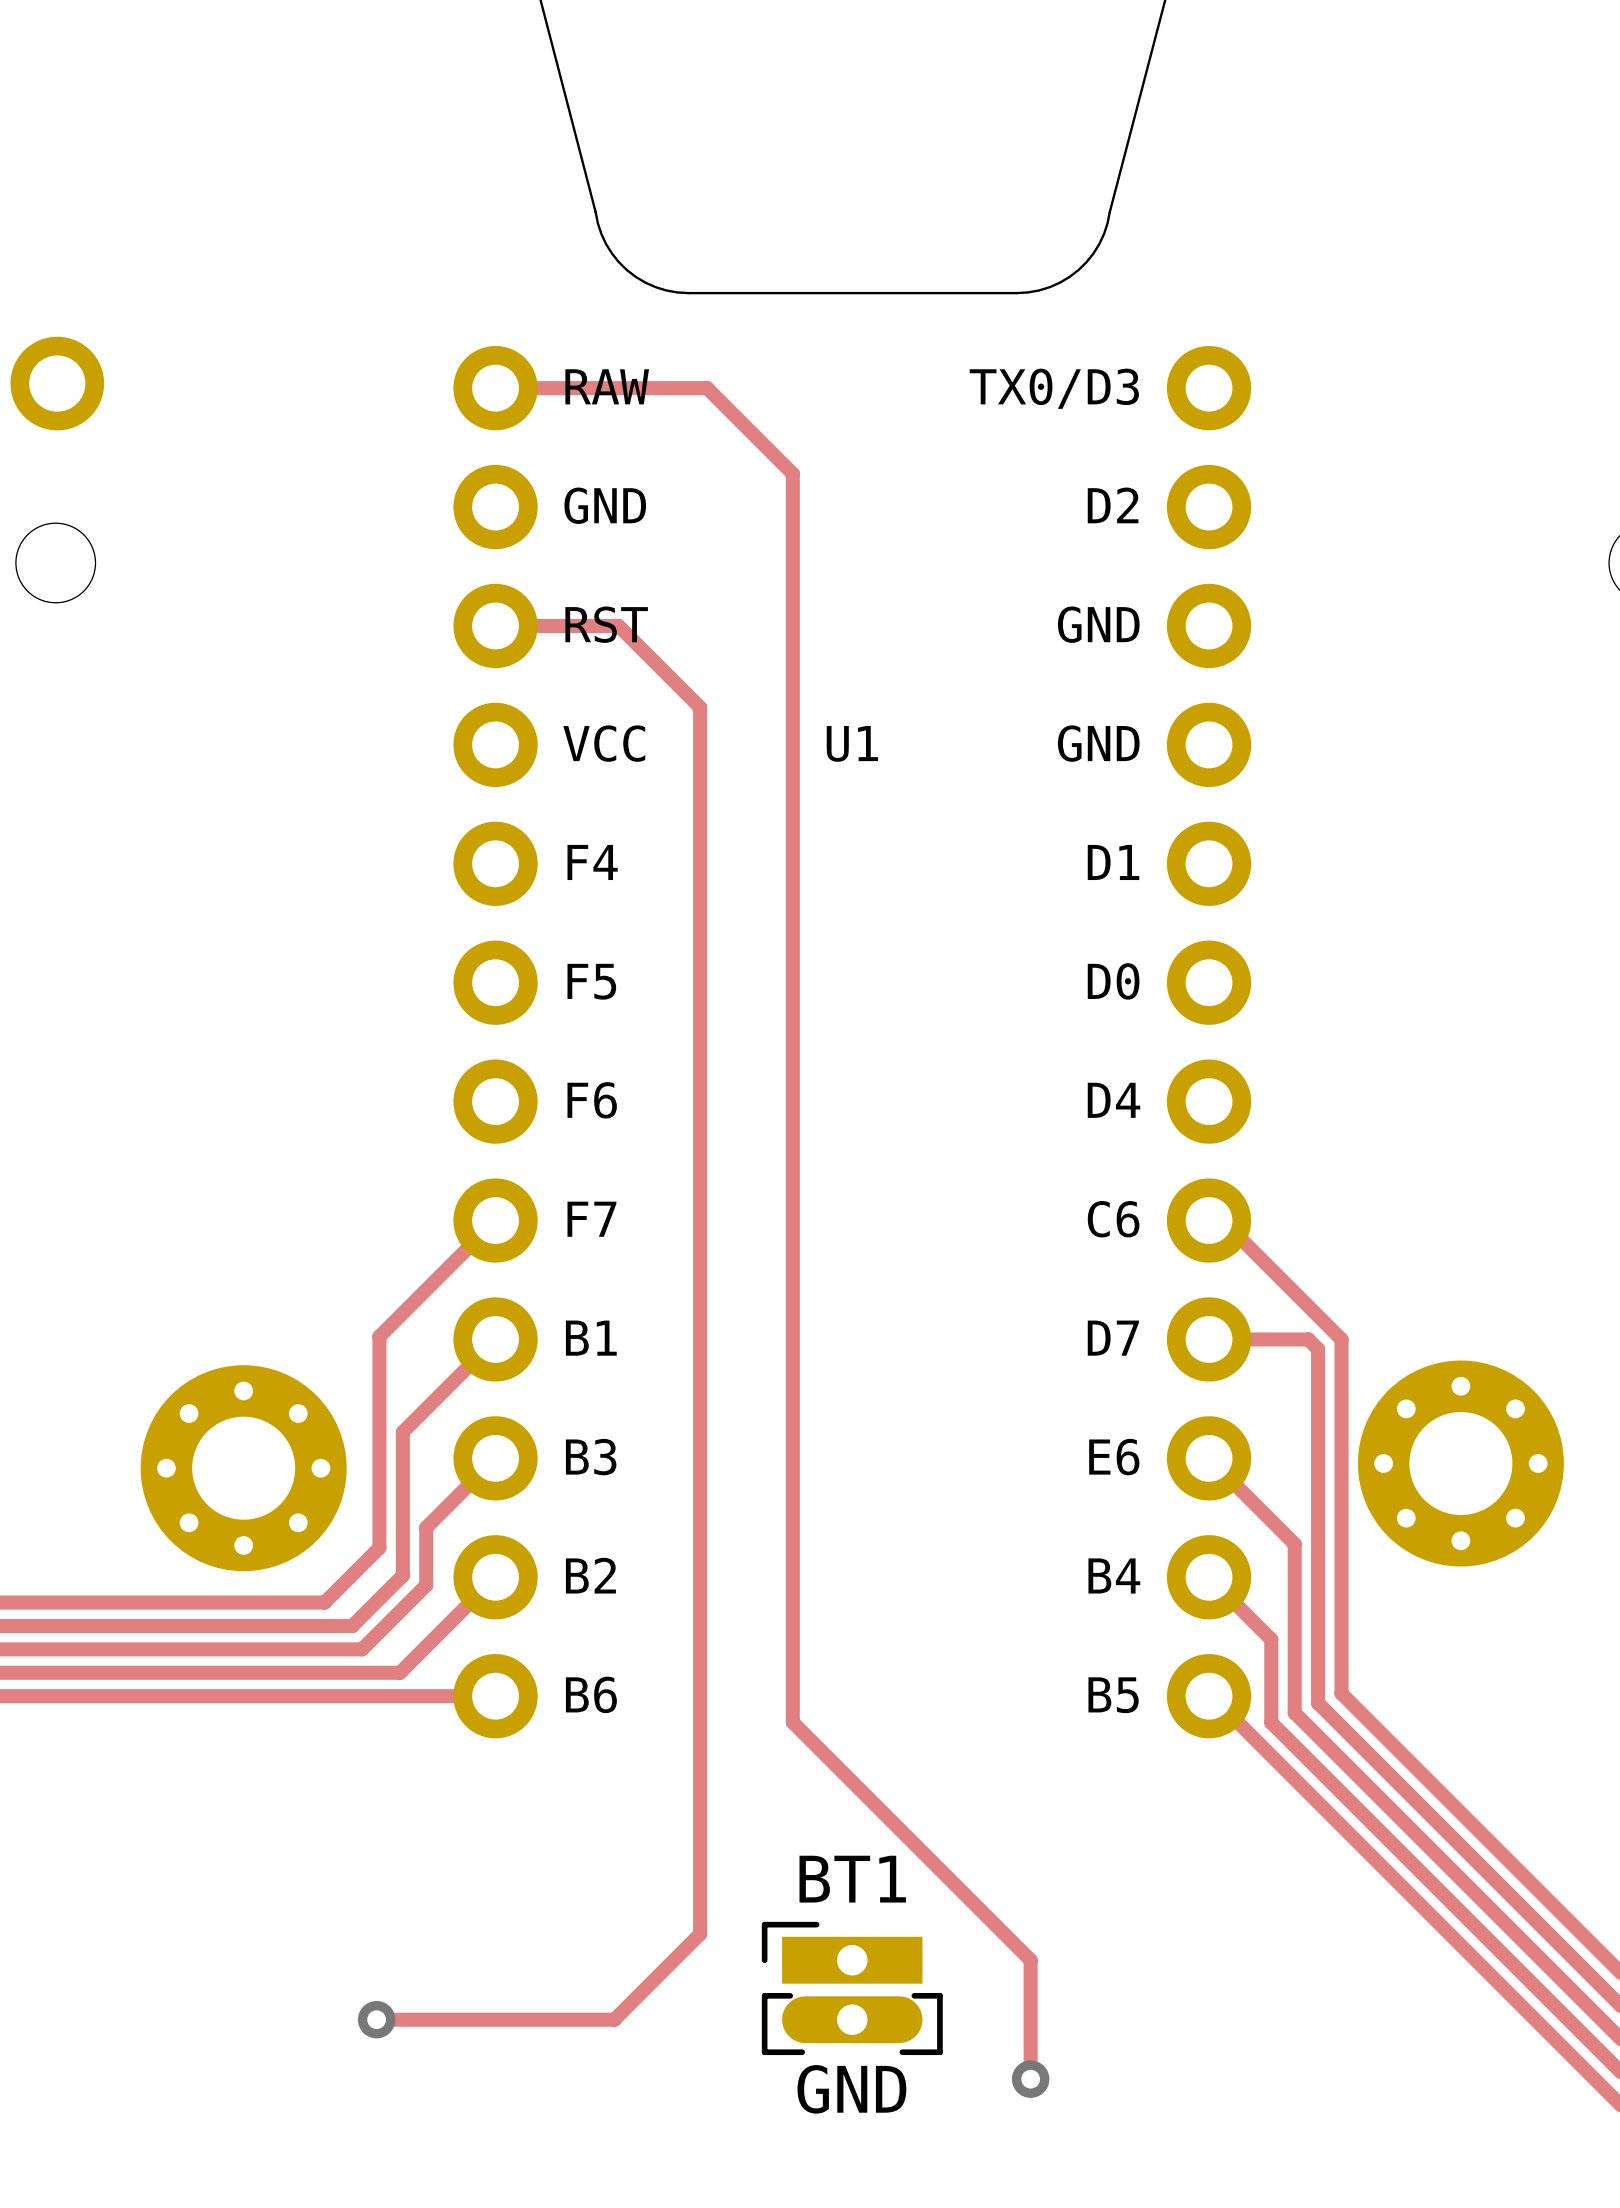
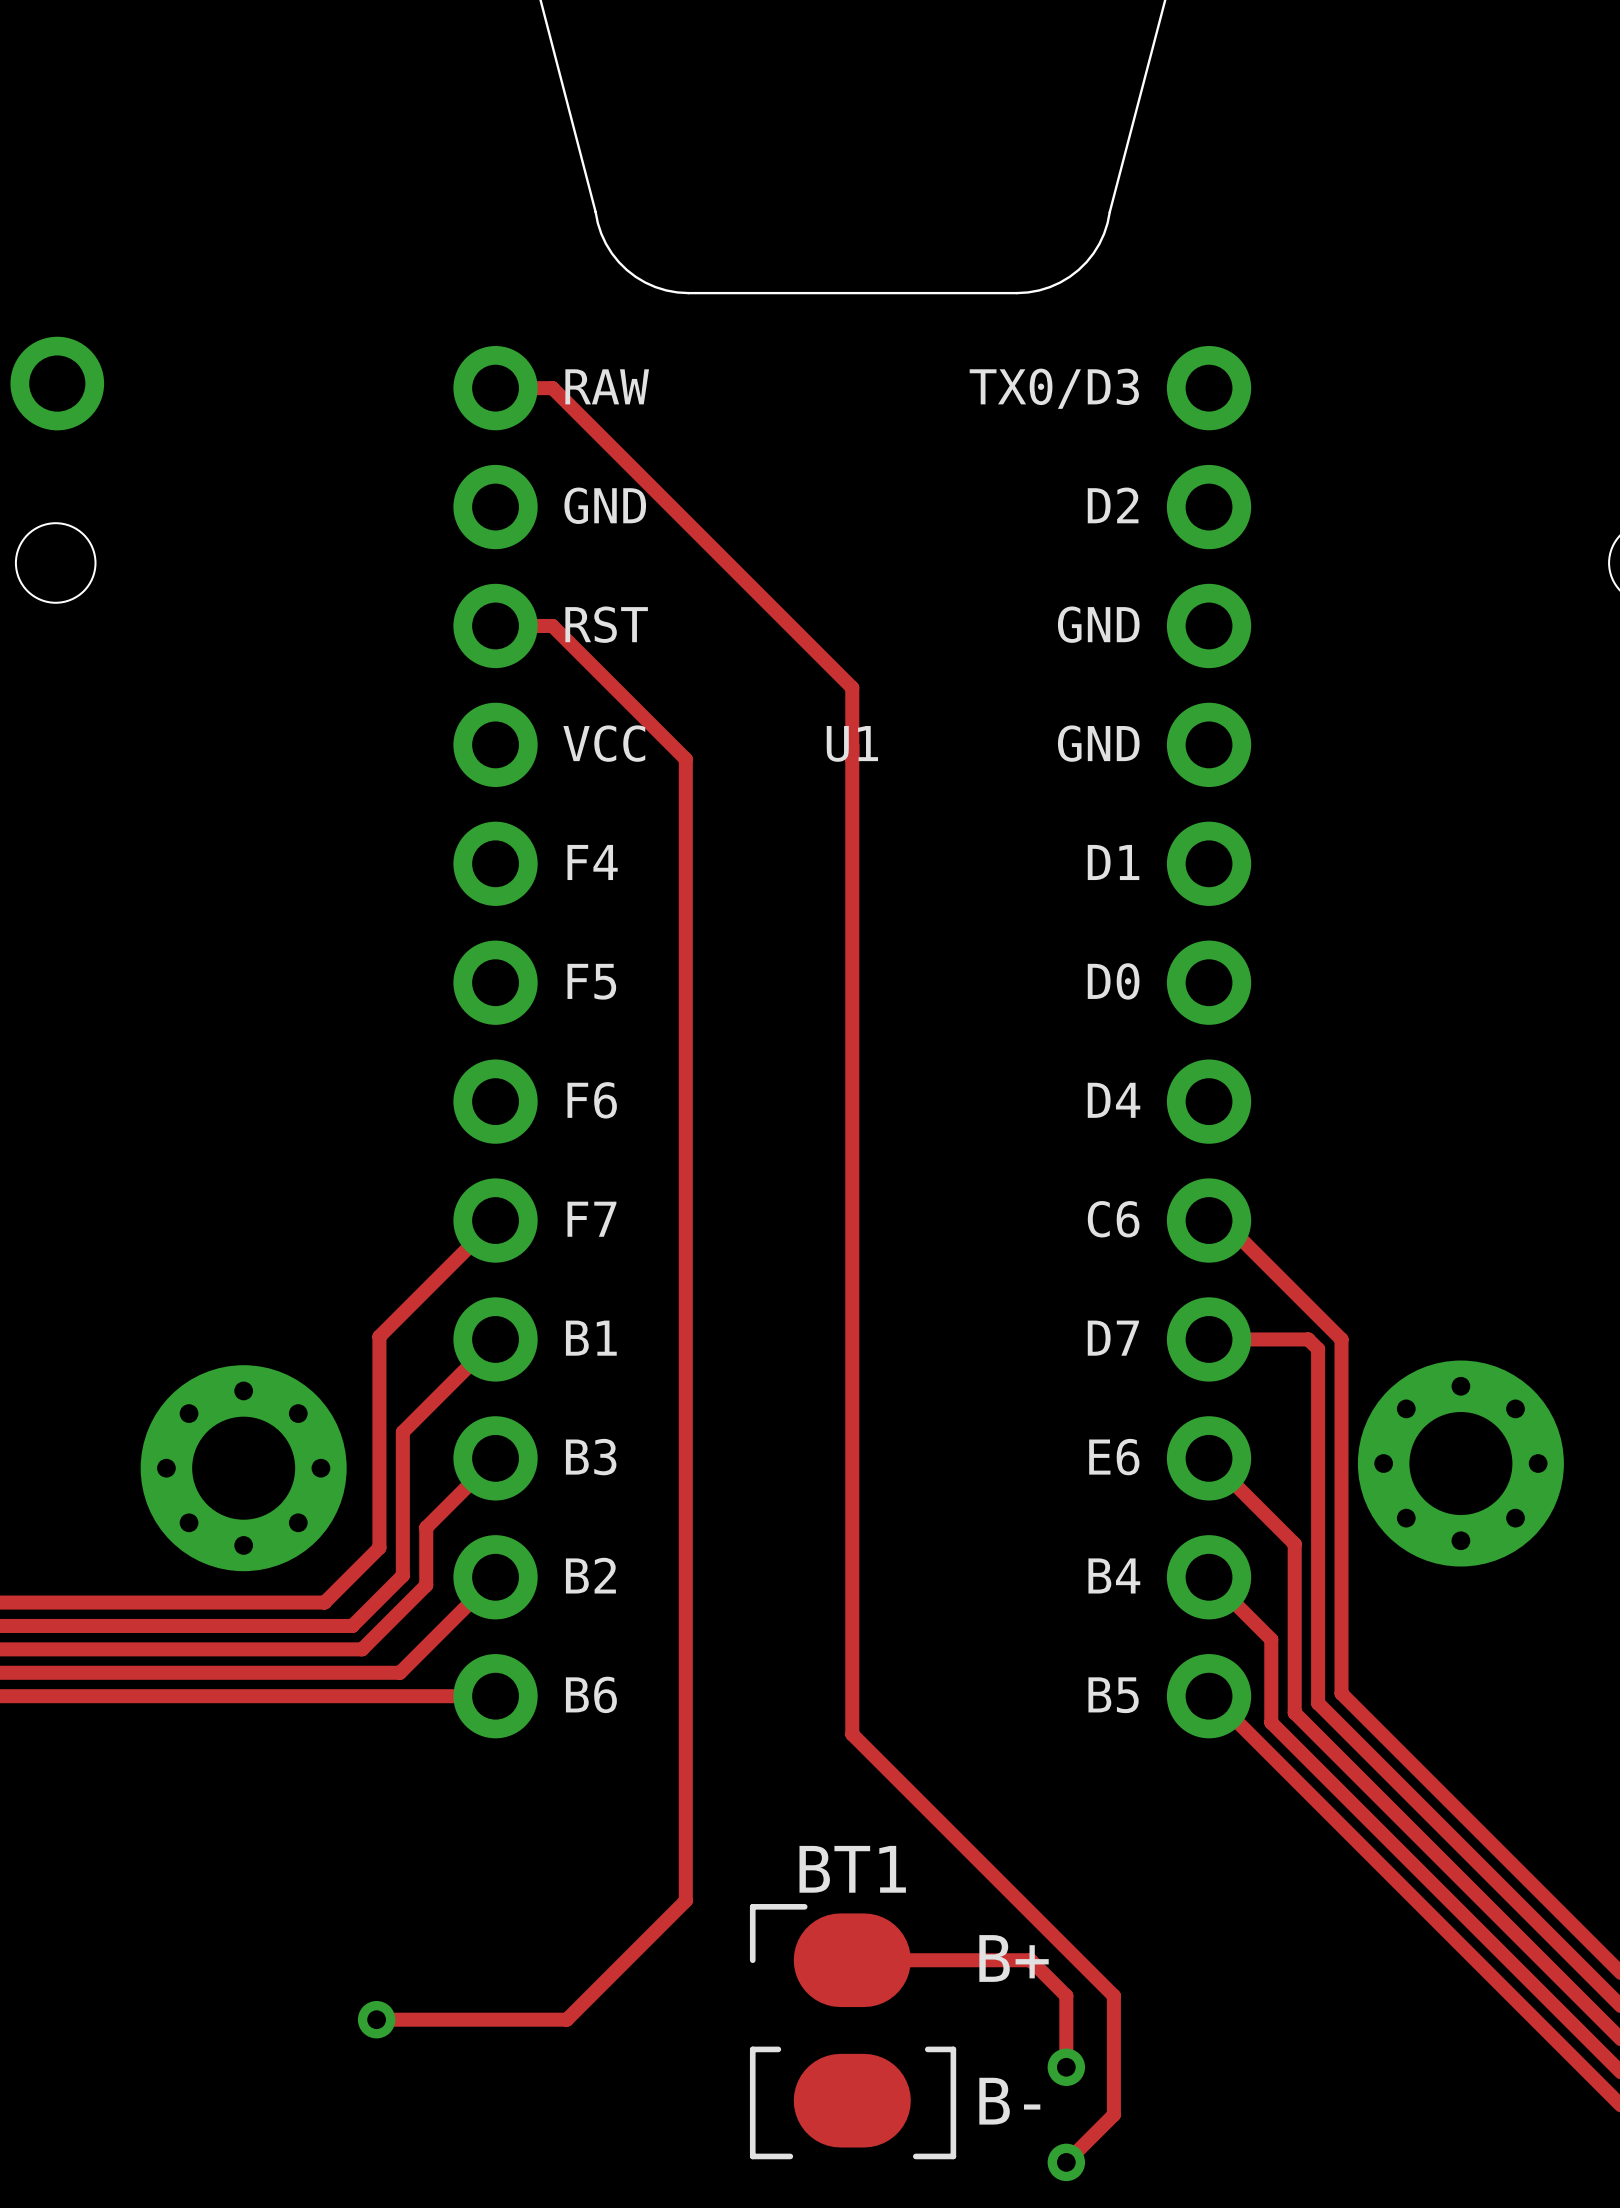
track: (552, 388) (707, 388) (792, 473) (792, 1722) (1030, 1960) (1030, 2079) -> (552, 388) (852, 687) (852, 1734) (1113, 1995) (1113, 2114) (1066, 2162)
track: (552, 625) (618, 625) (700, 707) (700, 1934) (614, 2019) (566, 2019) -> (552, 625) (685, 759) (685, 1900) (566, 2019)
BT1 footprint: [761, 1921, 943, 2056] -> [749, 1904, 957, 2160]
track: none -> (852, 1960) (1030, 1960) (1066, 1995) (1066, 2067)
via position: (1030, 2079) -> (1066, 2067)
via: none -> (1066, 2162)

